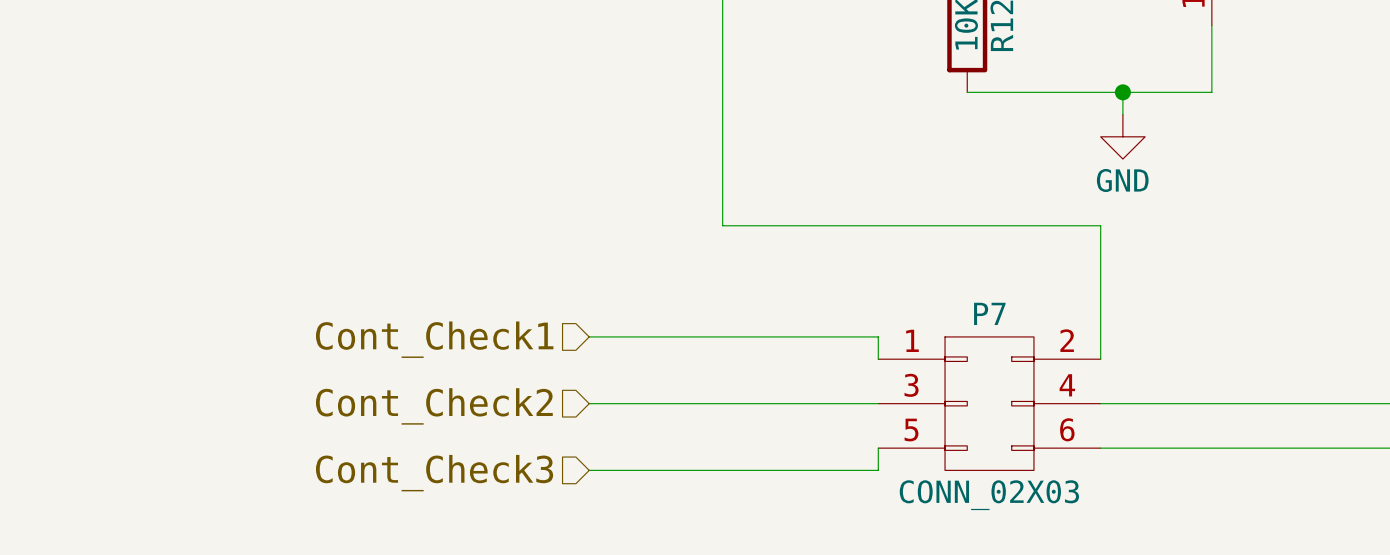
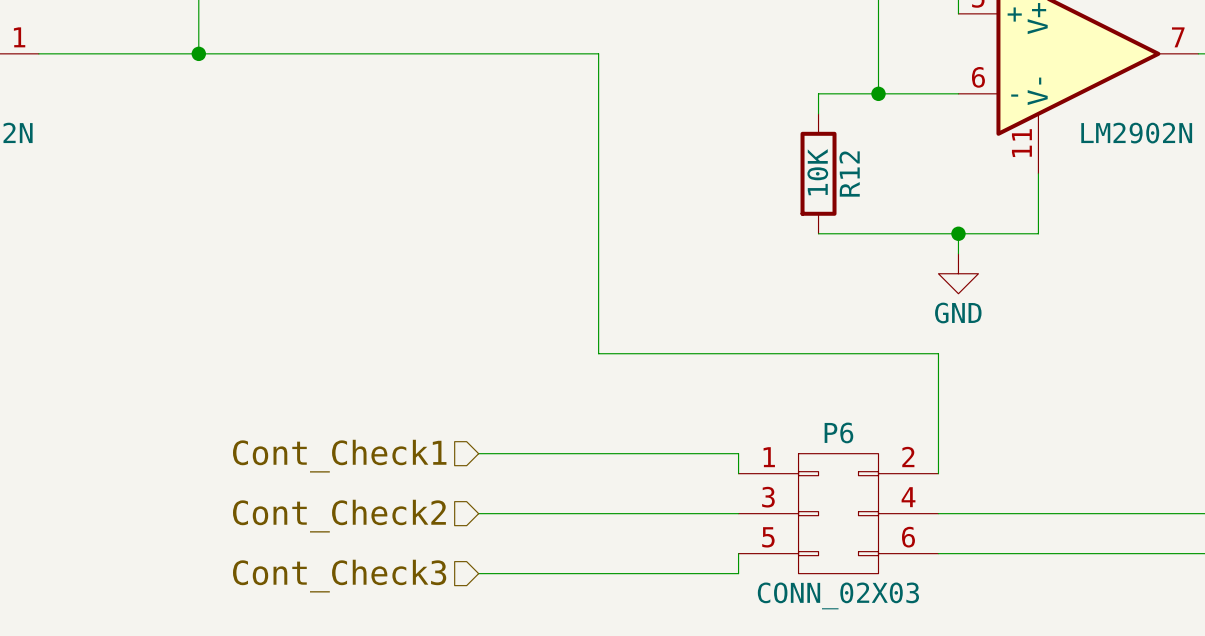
P7 name: P7 (989, 313) -> P6 (838, 432)

